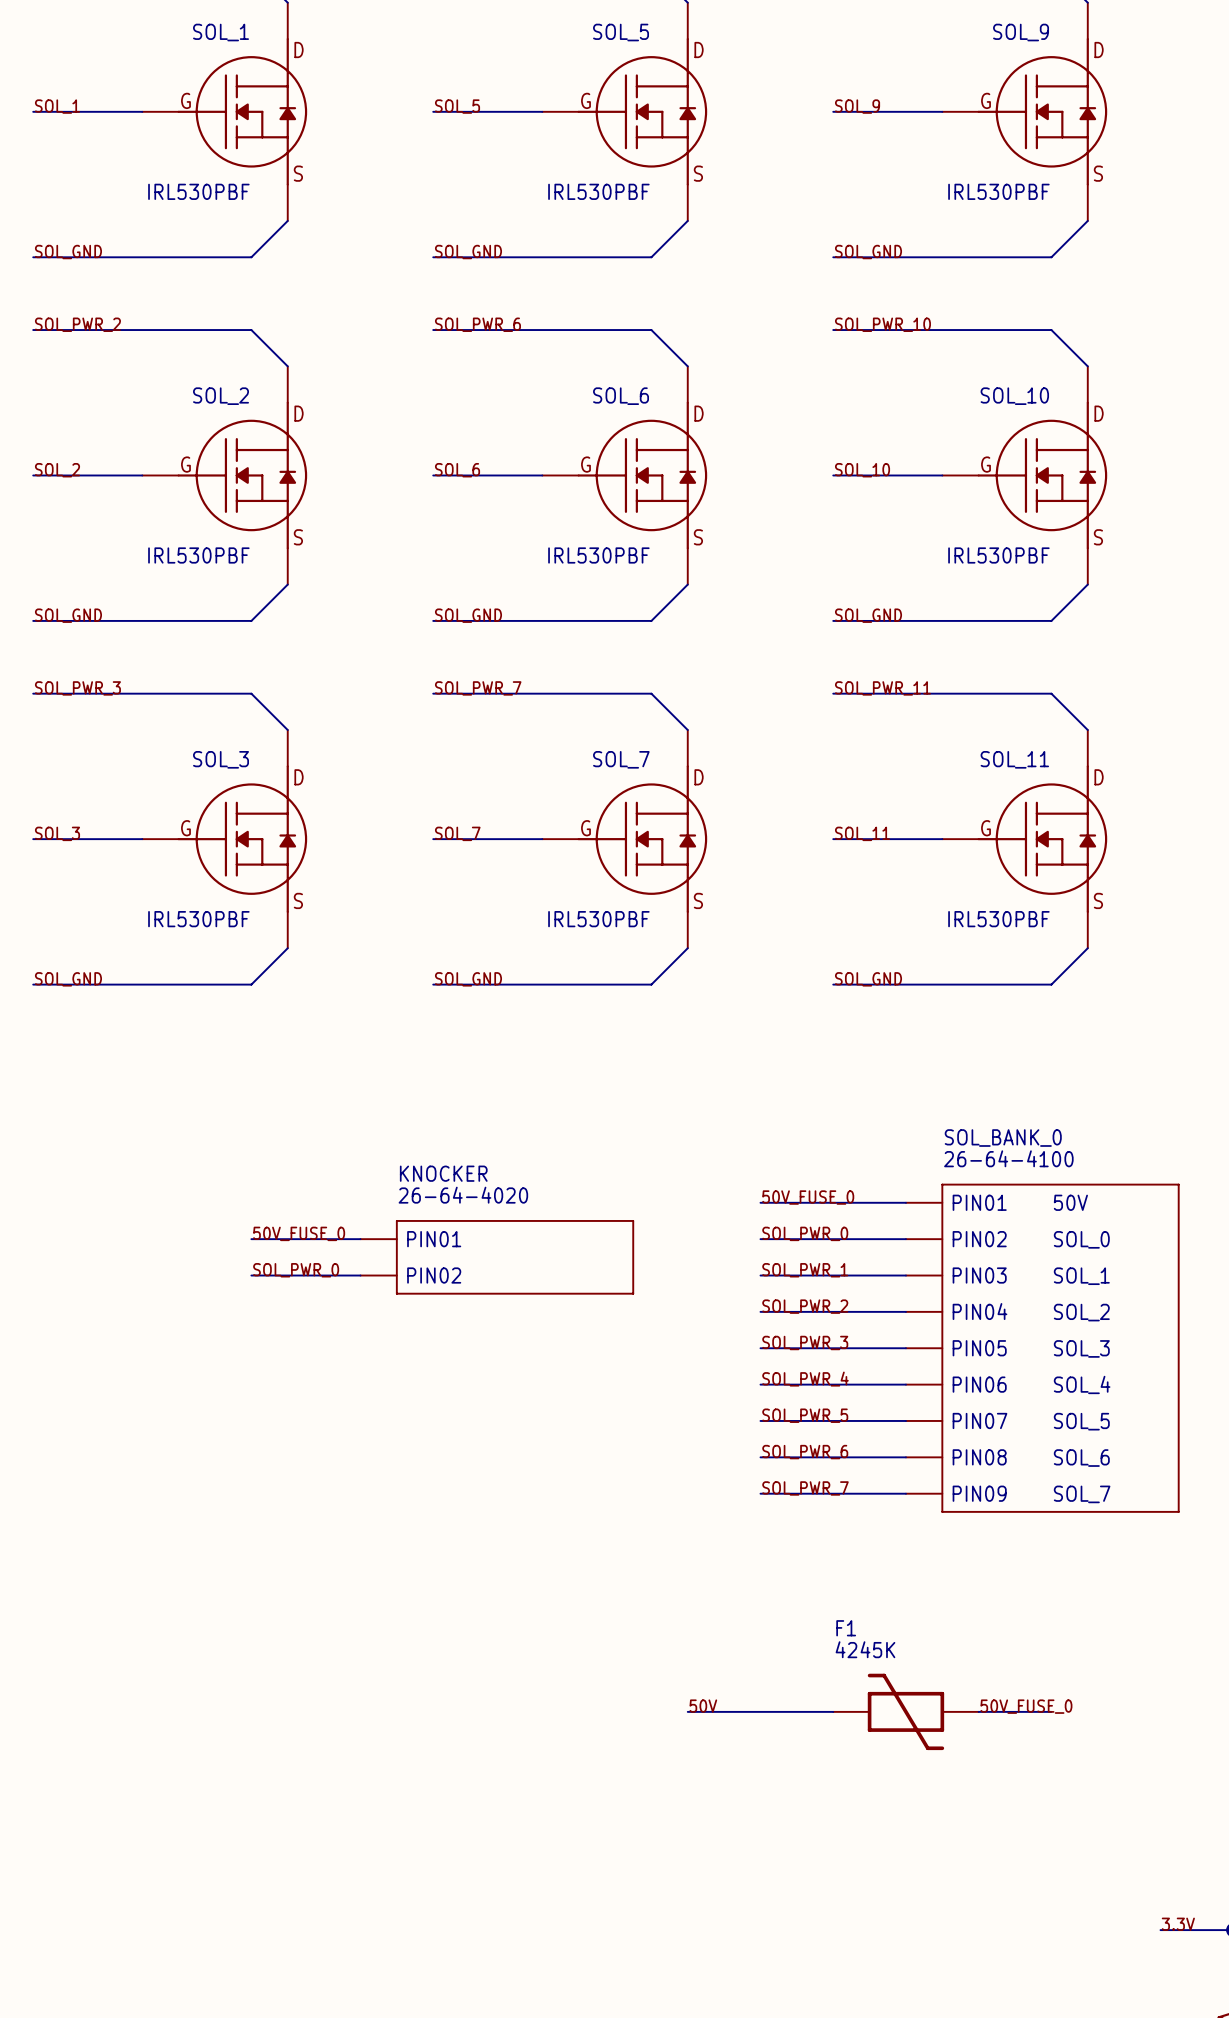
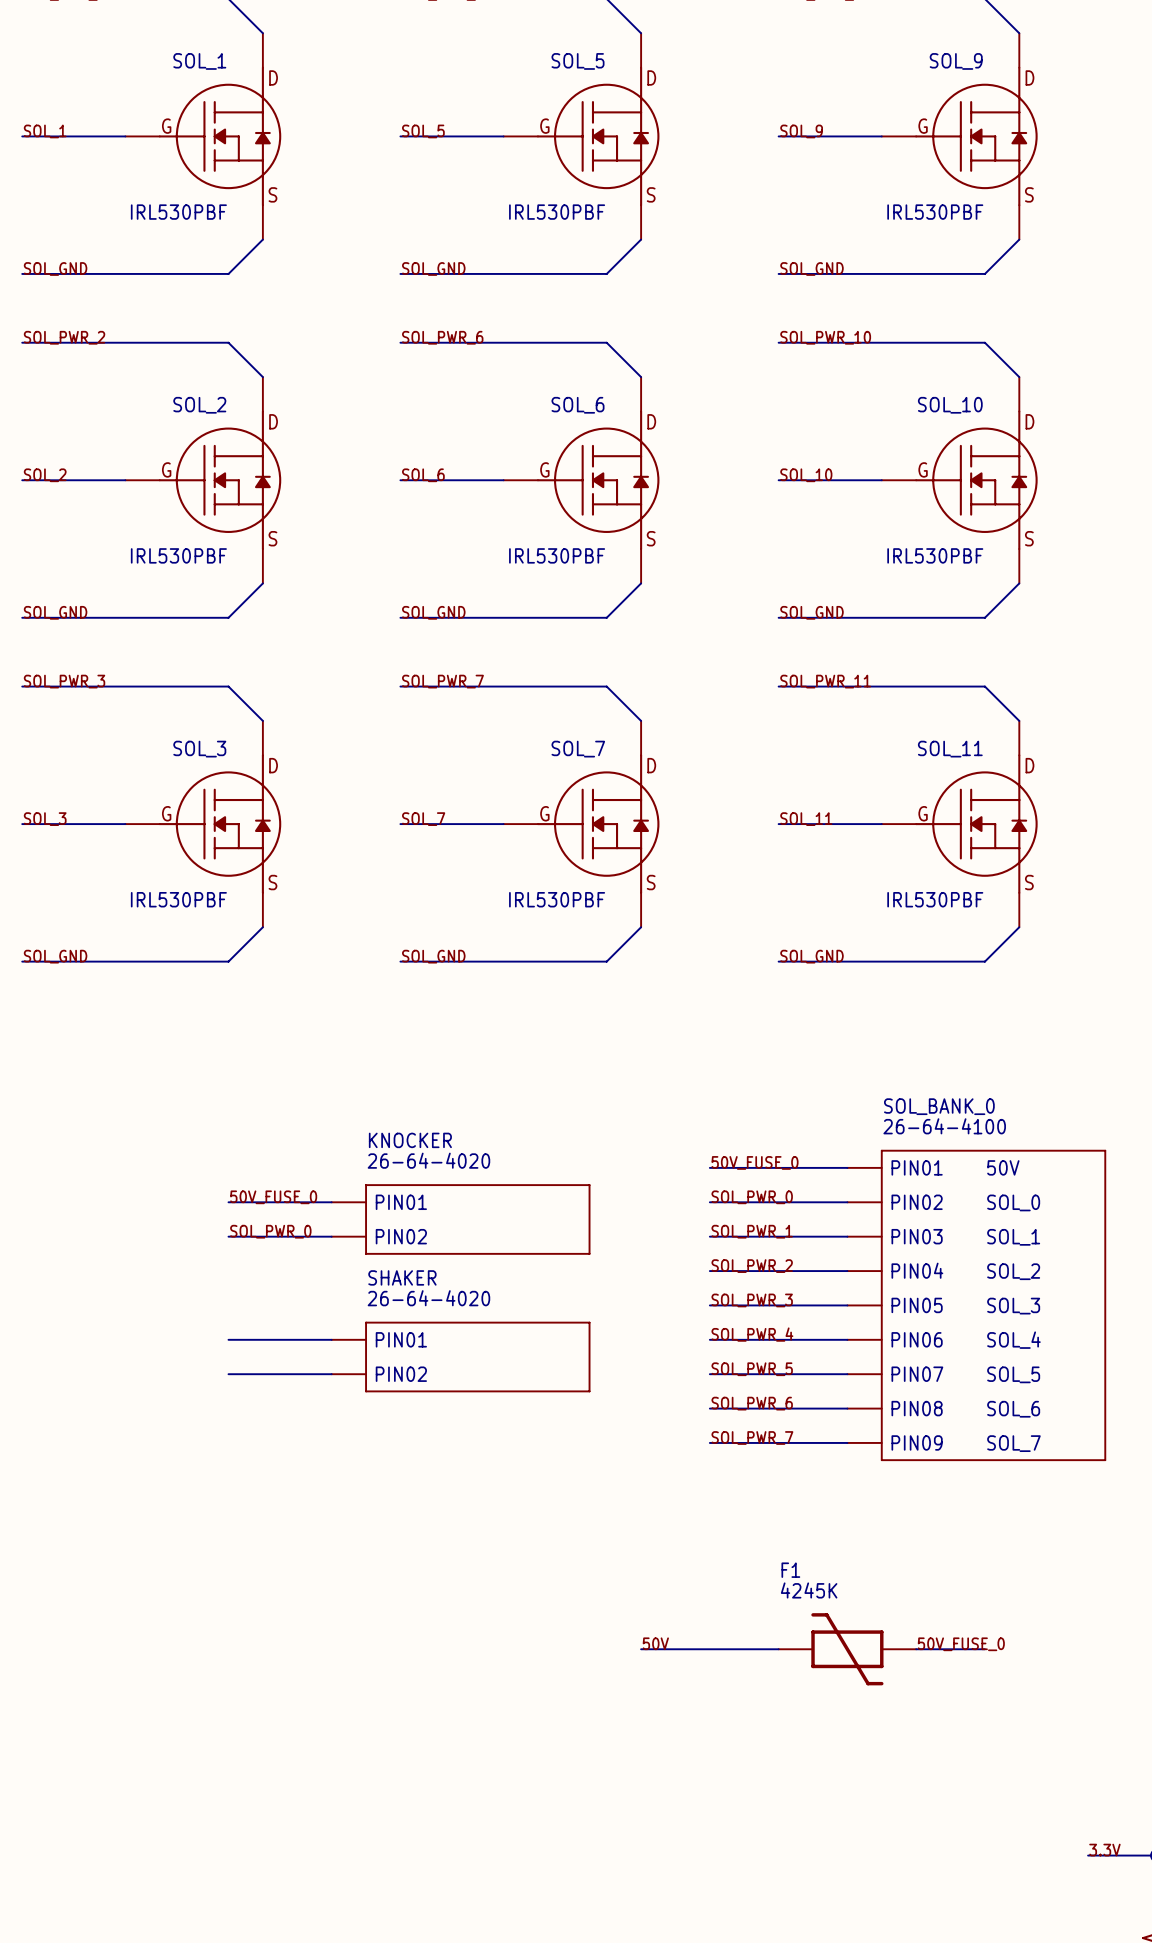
wire: none -> (228, 1339) (331, 1339)
SHAKER: none -> 26-64-4020 (461, 1357)
wire: none -> (228, 1374) (331, 1374)

